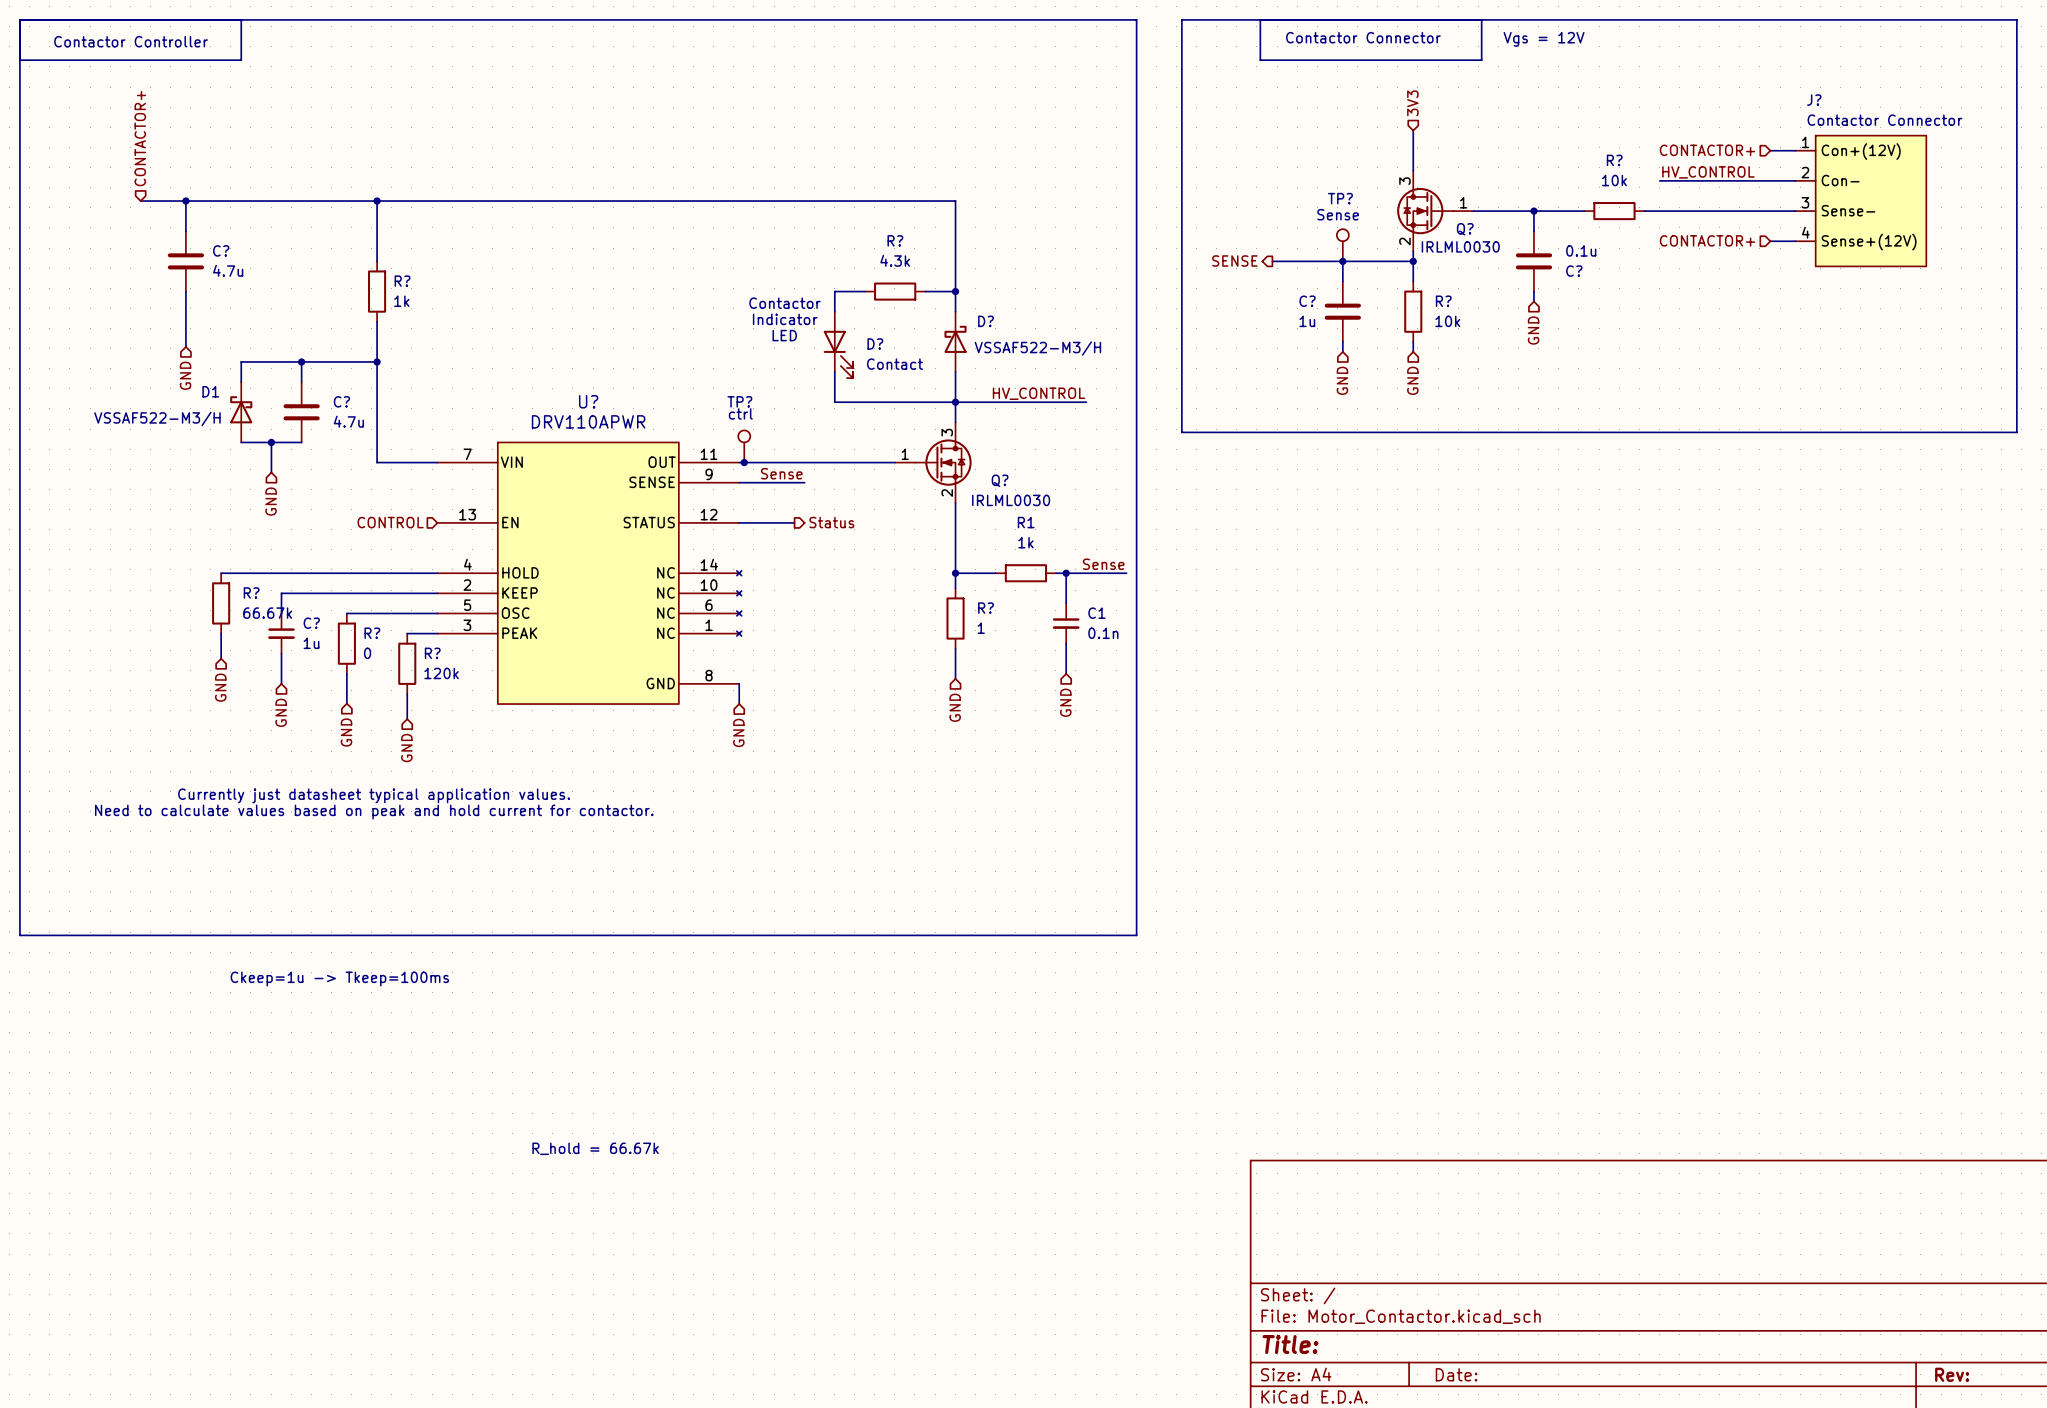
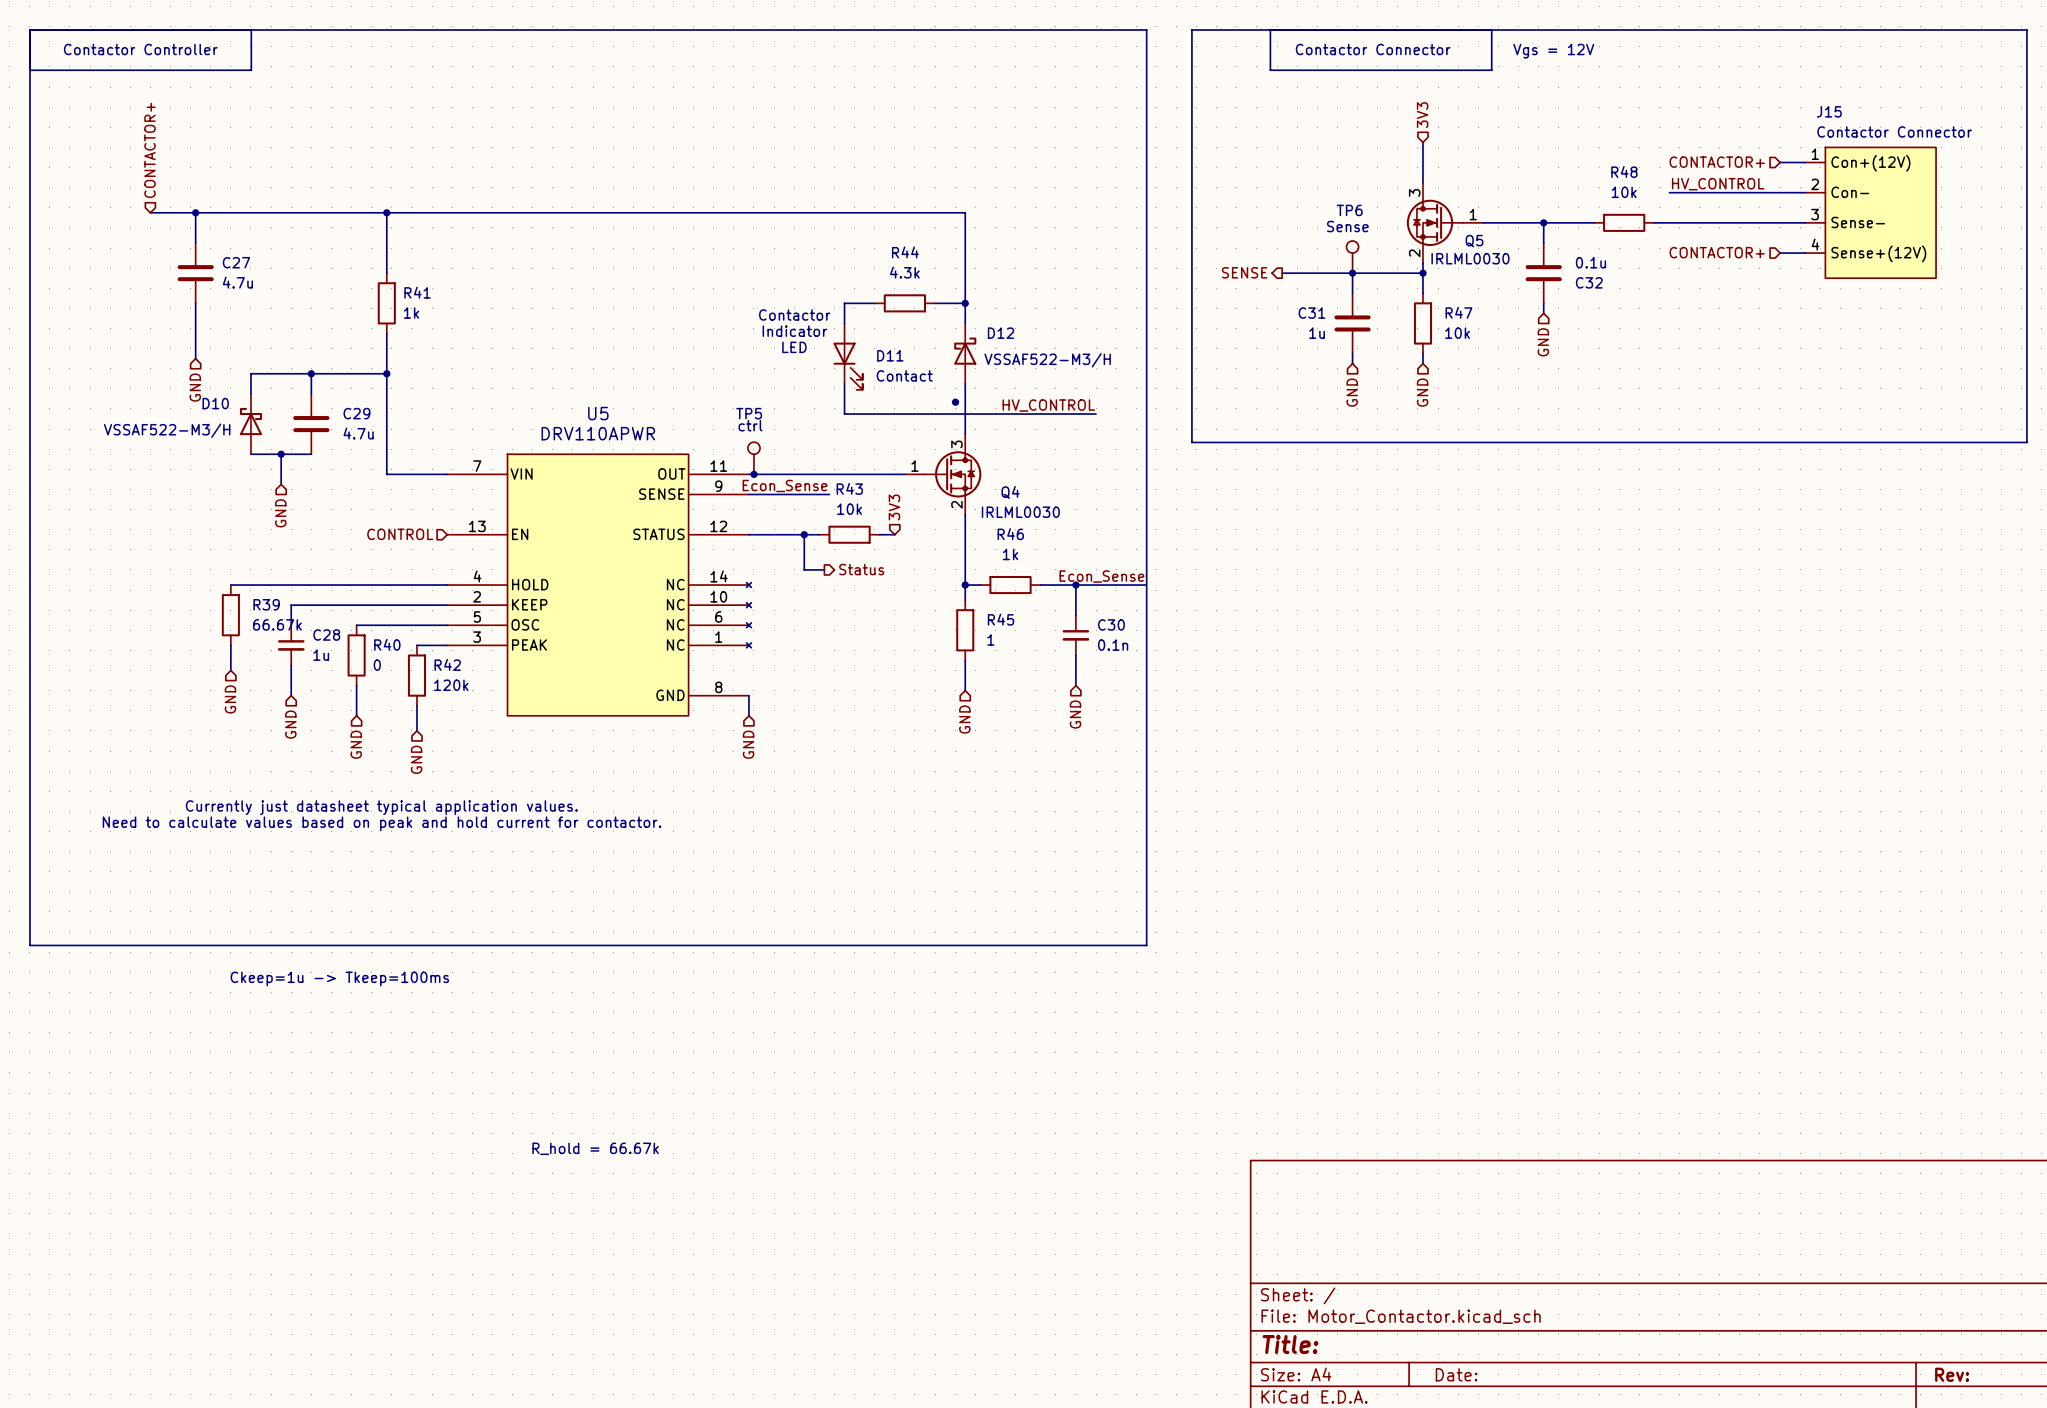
line: (19, 19) (1136, 19) (1136, 935) (19, 935) (19, 19) -> (30, 30) (1146, 30) (1146, 945) (30, 945) (30, 30)
line: (241, 19) (241, 60) (19, 60) -> (251, 30) (251, 70) (30, 70)
line: (1181, 19) (2016, 19) (2016, 432) (1181, 432) (1181, 19) -> (1191, 30) (2026, 30) (2026, 442) (1191, 442) (1191, 30)
line: (1260, 19) (1260, 60) (1481, 60) (1481, 19) -> (1270, 30) (1270, 70) (1491, 70) (1491, 30)
text position: Contactor Connector (1363, 37) -> Contactor Connector (1373, 49)
text position: Vgs = 12V (1544, 39) -> Vgs = 12V (1553, 51)
text position: Contactor Controller (131, 41) -> Contactor Controller (140, 49)
hierarchical label position: 3V3 (1412, 103) -> 3V3 (1422, 115)
wire: (1413, 130) (1413, 170) -> (1422, 142) (1422, 182)
hierarchical label position: CONTACTOR+ (140, 138) -> CONTACTOR+ (150, 150)
hierarchical label position: CONTACTOR+ (1707, 150) -> CONTACTOR+ (1717, 162)
wire: (1770, 150) (1795, 150) -> (1780, 162) (1805, 162)
label position: HV_CONTROL (1708, 172) -> HV_CONTROL (1718, 184)
wire: (1659, 180) (1795, 180) -> (1669, 192) (1805, 192)
wire: (140, 201) (955, 201) (955, 311) -> (150, 212) (965, 212) (965, 323)
wire: (185, 201) (185, 231) -> (195, 212) (195, 242)
junction position: (185, 201) -> (195, 212)
wire: (377, 201) (377, 261) -> (386, 212) (386, 273)
junction position: (377, 201) -> (386, 212)
J?: Contactor Connector (1860, 201) -> none
Q?: IRLML0030 (1435, 211) -> none
wire: (1473, 211) (1584, 211) -> (1483, 222) (1594, 222)
wire: (1533, 211) (1533, 231) -> (1543, 222) (1543, 242)
junction position: (1533, 211) -> (1543, 222)
R?: 10k (1614, 211) -> none
wire: (1644, 211) (1795, 211) -> (1654, 222) (1805, 222)
J15: none -> Contactor Connector (1870, 212)
Q5: none -> IRLML0030 (1445, 222)
R48: none -> 10k (1624, 222)
hierarchical label position: CONTACTOR+ (1707, 240) -> CONTACTOR+ (1717, 252)
wire: (1770, 241) (1795, 241) -> (1780, 253) (1805, 253)
TP?: Sense (1342, 245) -> none
wire: (1413, 251) (1413, 281) -> (1422, 263) (1422, 293)
TP6: none -> Sense (1352, 257)
C?: 4.7u (185, 261) -> none
hierarchical label position: SENSE (1234, 261) -> SENSE (1244, 272)
wire: (1272, 261) (1413, 261) -> (1282, 273) (1422, 273)
wire: (1342, 261) (1342, 281) -> (1352, 273) (1352, 293)
junction position: (1342, 261) -> (1352, 273)
junction position: (1413, 261) -> (1422, 273)
C?: 0.1u (1533, 261) -> none
C27: none -> 4.7u (195, 273)
C32: none -> 0.1u (1543, 273)
wire: (185, 291) (185, 346) -> (195, 303) (195, 358)
R?: 1k (377, 291) -> none
wire: (864, 291) (834, 291) (834, 311) -> (874, 303) (844, 303) (844, 323)
R?: 4.3k (895, 291) -> none
wire: (925, 291) (955, 291) -> (935, 303) (965, 303)
junction position: (955, 291) -> (965, 303)
wire: (1533, 291) (1533, 301) -> (1543, 303) (1543, 313)
R41: none -> 1k (386, 303)
text position: Contactor (784, 303) -> Contactor (794, 314)
R44: none -> 4.3k (904, 303)
C?: 1u (1342, 311) -> none
R?: 10k (1413, 311) -> none
text position: Indicator (785, 319) -> Indicator (794, 331)
wire: (377, 321) (377, 462) (437, 462) -> (386, 333) (386, 474) (447, 474)
C31: none -> 1u (1352, 323)
R47: none -> 10k (1422, 323)
hierarchical label position: GND (1533, 330) -> GND (1543, 342)
text position: LED (784, 335) -> LED (794, 347)
D?: VSSAF522-M3/H (955, 341) -> none
wire: (1342, 341) (1342, 351) -> (1352, 353) (1352, 363)
wire: (1413, 341) (1413, 351) -> (1422, 353) (1422, 363)
D?: Contact (838, 344) -> none
D12: none -> VSSAF522-M3/H (965, 353)
D11: none -> Contact (848, 356)
wire: (301, 361) (301, 382) -> (311, 373) (311, 393)
junction position: (301, 361) -> (311, 373)
wire: (377, 361) (241, 361) (241, 382) -> (386, 373) (250, 373) (250, 393)
junction position: (377, 361) -> (386, 373)
wire: (834, 372) (834, 402) (1086, 402) -> (844, 383) (844, 414) (1096, 414)
wire: (955, 372) (955, 422) -> (965, 383) (965, 434)
hierarchical label position: GND (185, 375) -> GND (195, 387)
hierarchical label position: GND (1342, 380) -> GND (1352, 392)
hierarchical label position: GND (1412, 380) -> GND (1422, 392)
label position: HV_CONTROL (1039, 393) -> HV_CONTROL (1048, 405)
D1: VSSAF522-M3/H (241, 412) -> none
C?: 4.7u (301, 412) -> none
D10: none -> VSSAF522-M3/H (250, 424)
C29: none -> 4.7u (311, 424)
wire: (241, 442) (301, 442) -> (250, 454) (311, 454)
wire: (271, 442) (271, 472) -> (281, 454) (281, 484)
junction position: (271, 442) -> (281, 454)
TP?: ctrl (744, 446) -> none
TP5: none -> ctrl (753, 458)
wire: (739, 462) (895, 462) -> (748, 474) (904, 474)
junction position: (744, 462) -> (753, 474)
Q?: IRLML0030 (933, 462) -> none
label: Sense (781, 473) -> Econ_Sense (785, 485)
Q4: none -> IRLML0030 (943, 474)
wire: (739, 482) (804, 482) -> none
wire: none -> (748, 494) (829, 494)
hierarchical label position: GND (271, 501) -> GND (280, 513)
wire: (955, 502) (955, 588) -> (965, 514) (965, 600)
hierarchical label: none -> 3V3 (894, 507)
hierarchical label position: CONTROL (390, 522) -> CONTROL (400, 534)
wire: (739, 522) (794, 522) -> none
hierarchical label position: Status (831, 522) -> Status (861, 569)
wire: none -> (748, 534) (819, 534)
wire: none -> (804, 534) (804, 569) (824, 569)
junction: none -> (804, 534)
R43: none -> 10k (849, 534)
wire: none -> (879, 534) (894, 534)
label: Sense (1103, 564) -> Econ_Sense (1101, 576)
wire: (221, 573) (437, 573) -> (230, 585) (447, 585)
U?: DRV110APWR (589, 573) -> none
wire: (955, 573) (995, 573) -> none
junction position: (955, 573) -> (965, 585)
R1: 1k (1025, 573) -> none
wire: (1056, 573) (1126, 573) -> none
wire: (1066, 573) (1066, 603) -> (1075, 585) (1075, 615)
junction position: (1066, 573) -> (1075, 585)
U5: none -> DRV110APWR (599, 585)
wire: none -> (965, 585) (980, 585)
R46: none -> 1k (1010, 585)
wire: none -> (1040, 585) (1146, 585)
wire: (437, 593) (281, 593) (281, 613) -> (447, 605) (291, 605) (291, 625)
R?: 66.67k (221, 603) -> none
wire: (346, 613) (437, 613) -> (356, 625) (447, 625)
R39: none -> 66.67k (230, 615)
R?: 1 (955, 618) -> none
C1: 0.1n (1066, 623) -> none
R45: none -> 1 (965, 630)
wire: (221, 633) (221, 658) -> (230, 645) (230, 670)
C?: 1u (281, 633) -> none
wire: (407, 633) (437, 633) -> (416, 645) (447, 645)
C30: none -> 0.1n (1075, 635)
R?: 0 (346, 643) -> none
wire: (1066, 643) (1066, 673) -> (1075, 655) (1075, 685)
C28: none -> 1u (291, 645)
wire: (955, 648) (955, 678) -> (965, 660) (965, 690)
wire: (281, 653) (281, 683) -> (291, 665) (291, 695)
R40: none -> 0 (356, 655)
R?: 120k (407, 663) -> none
wire: (346, 673) (346, 703) -> none
R42: none -> 120k (416, 675)
wire: (739, 683) (739, 704) -> (748, 695) (748, 715)
wire: none -> (356, 685) (356, 715)
hierarchical label position: GND (220, 687) -> GND (230, 699)
wire: (407, 693) (407, 719) -> (416, 705) (416, 730)
hierarchical label position: GND (1065, 702) -> GND (1075, 714)
hierarchical label position: GND (955, 707) -> GND (964, 719)
hierarchical label position: GND (281, 712) -> GND (290, 724)
hierarchical label position: GND (346, 732) -> GND (356, 744)
hierarchical label position: GND (738, 732) -> GND (748, 744)
hierarchical label position: GND (406, 748) -> GND (416, 759)
text position: Currently just datasheet typical application values. (374, 795) -> Currently just datasheet typical application values. (381, 807)
text position: Need to calculate values based on peak and hold current for contactor. (374, 812) -> Need to calculate values based on peak and hold current for contactor. (382, 823)

